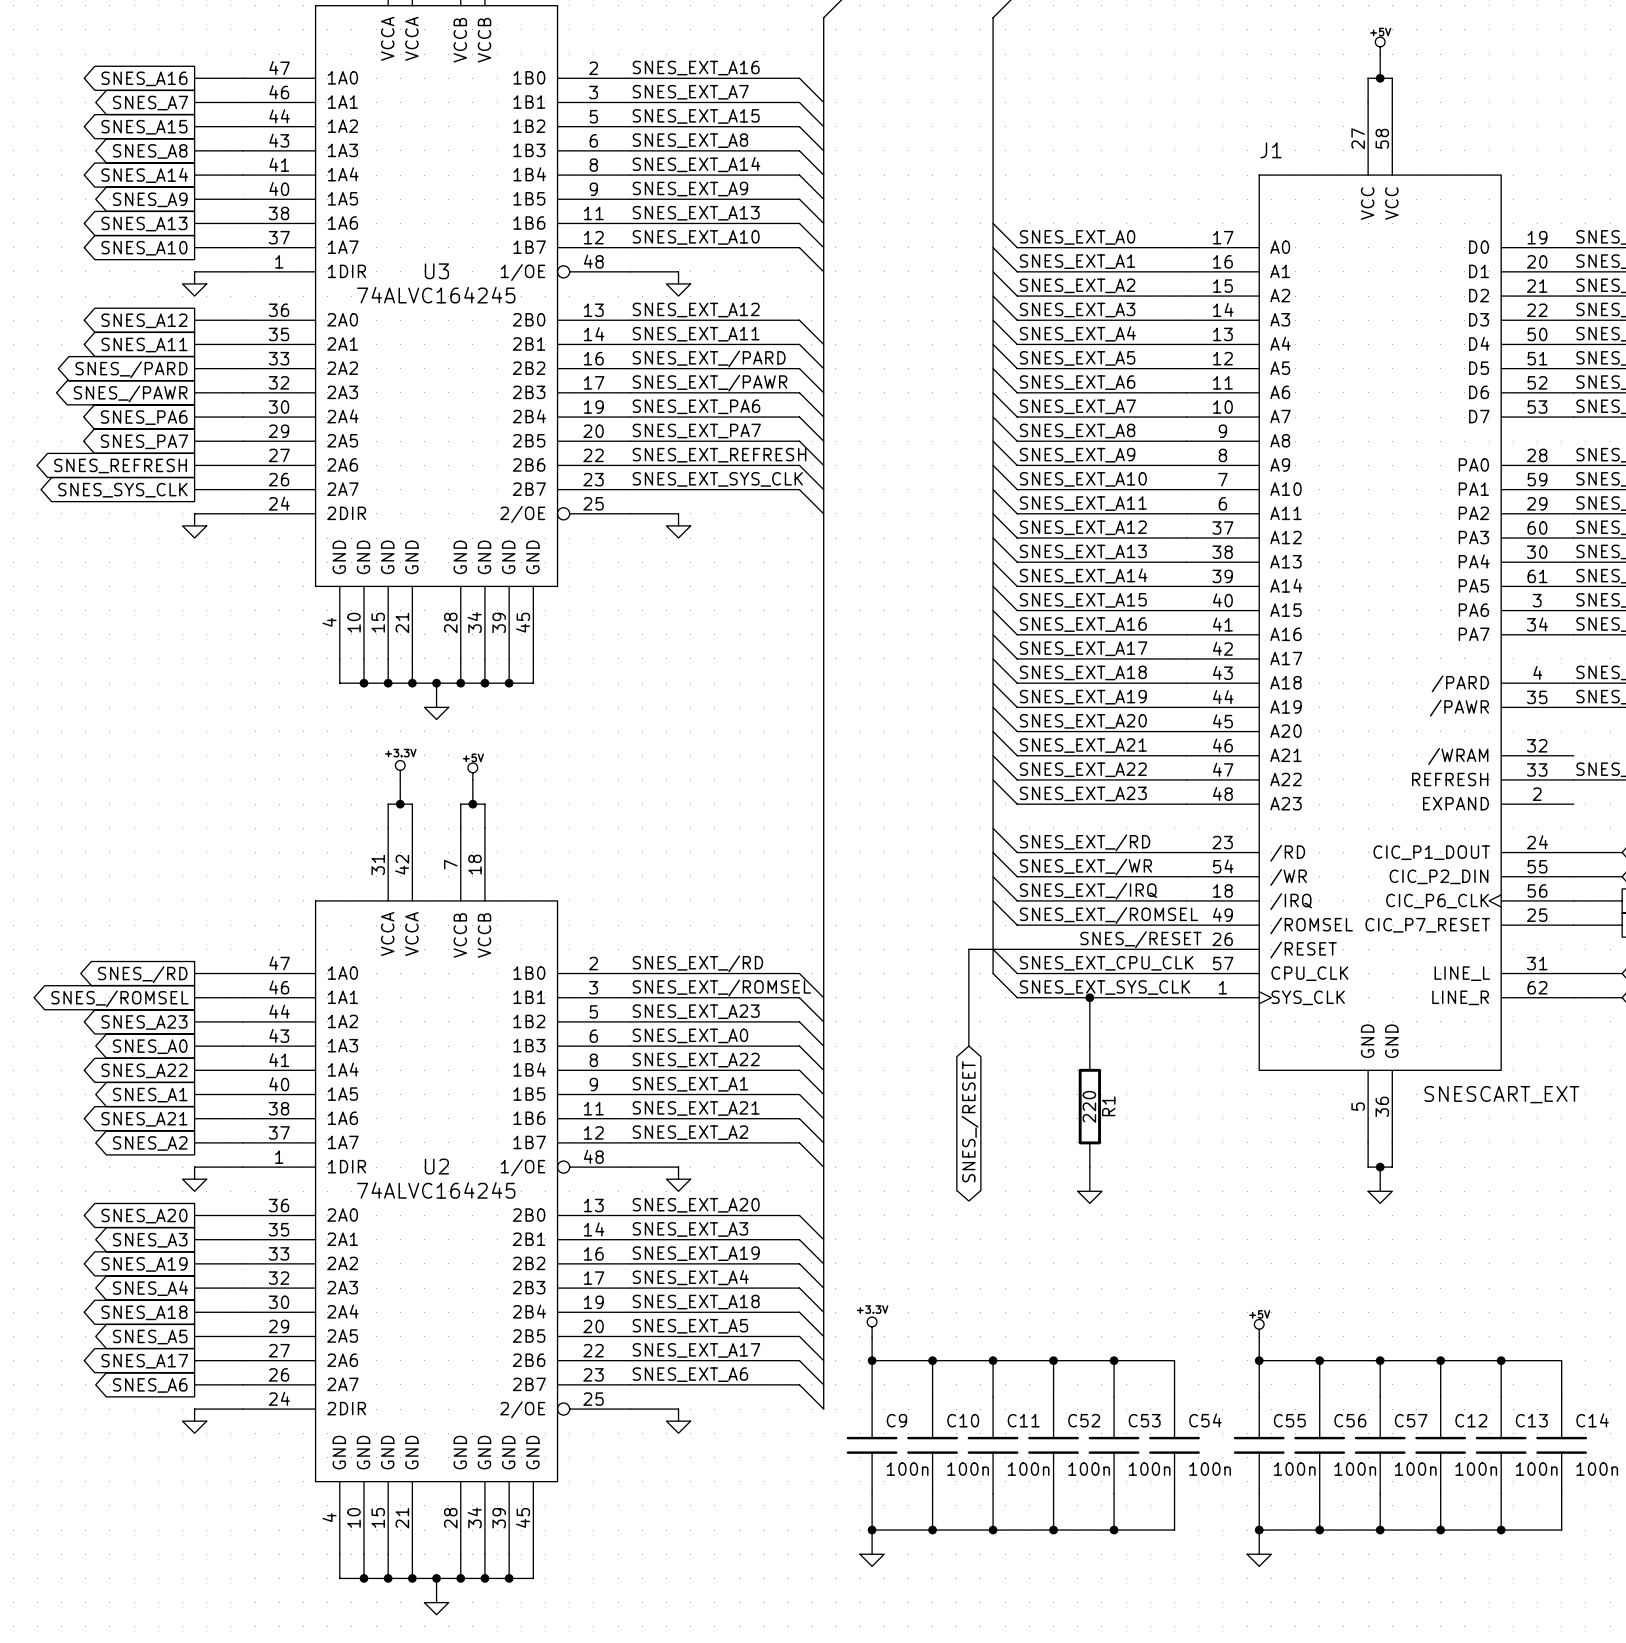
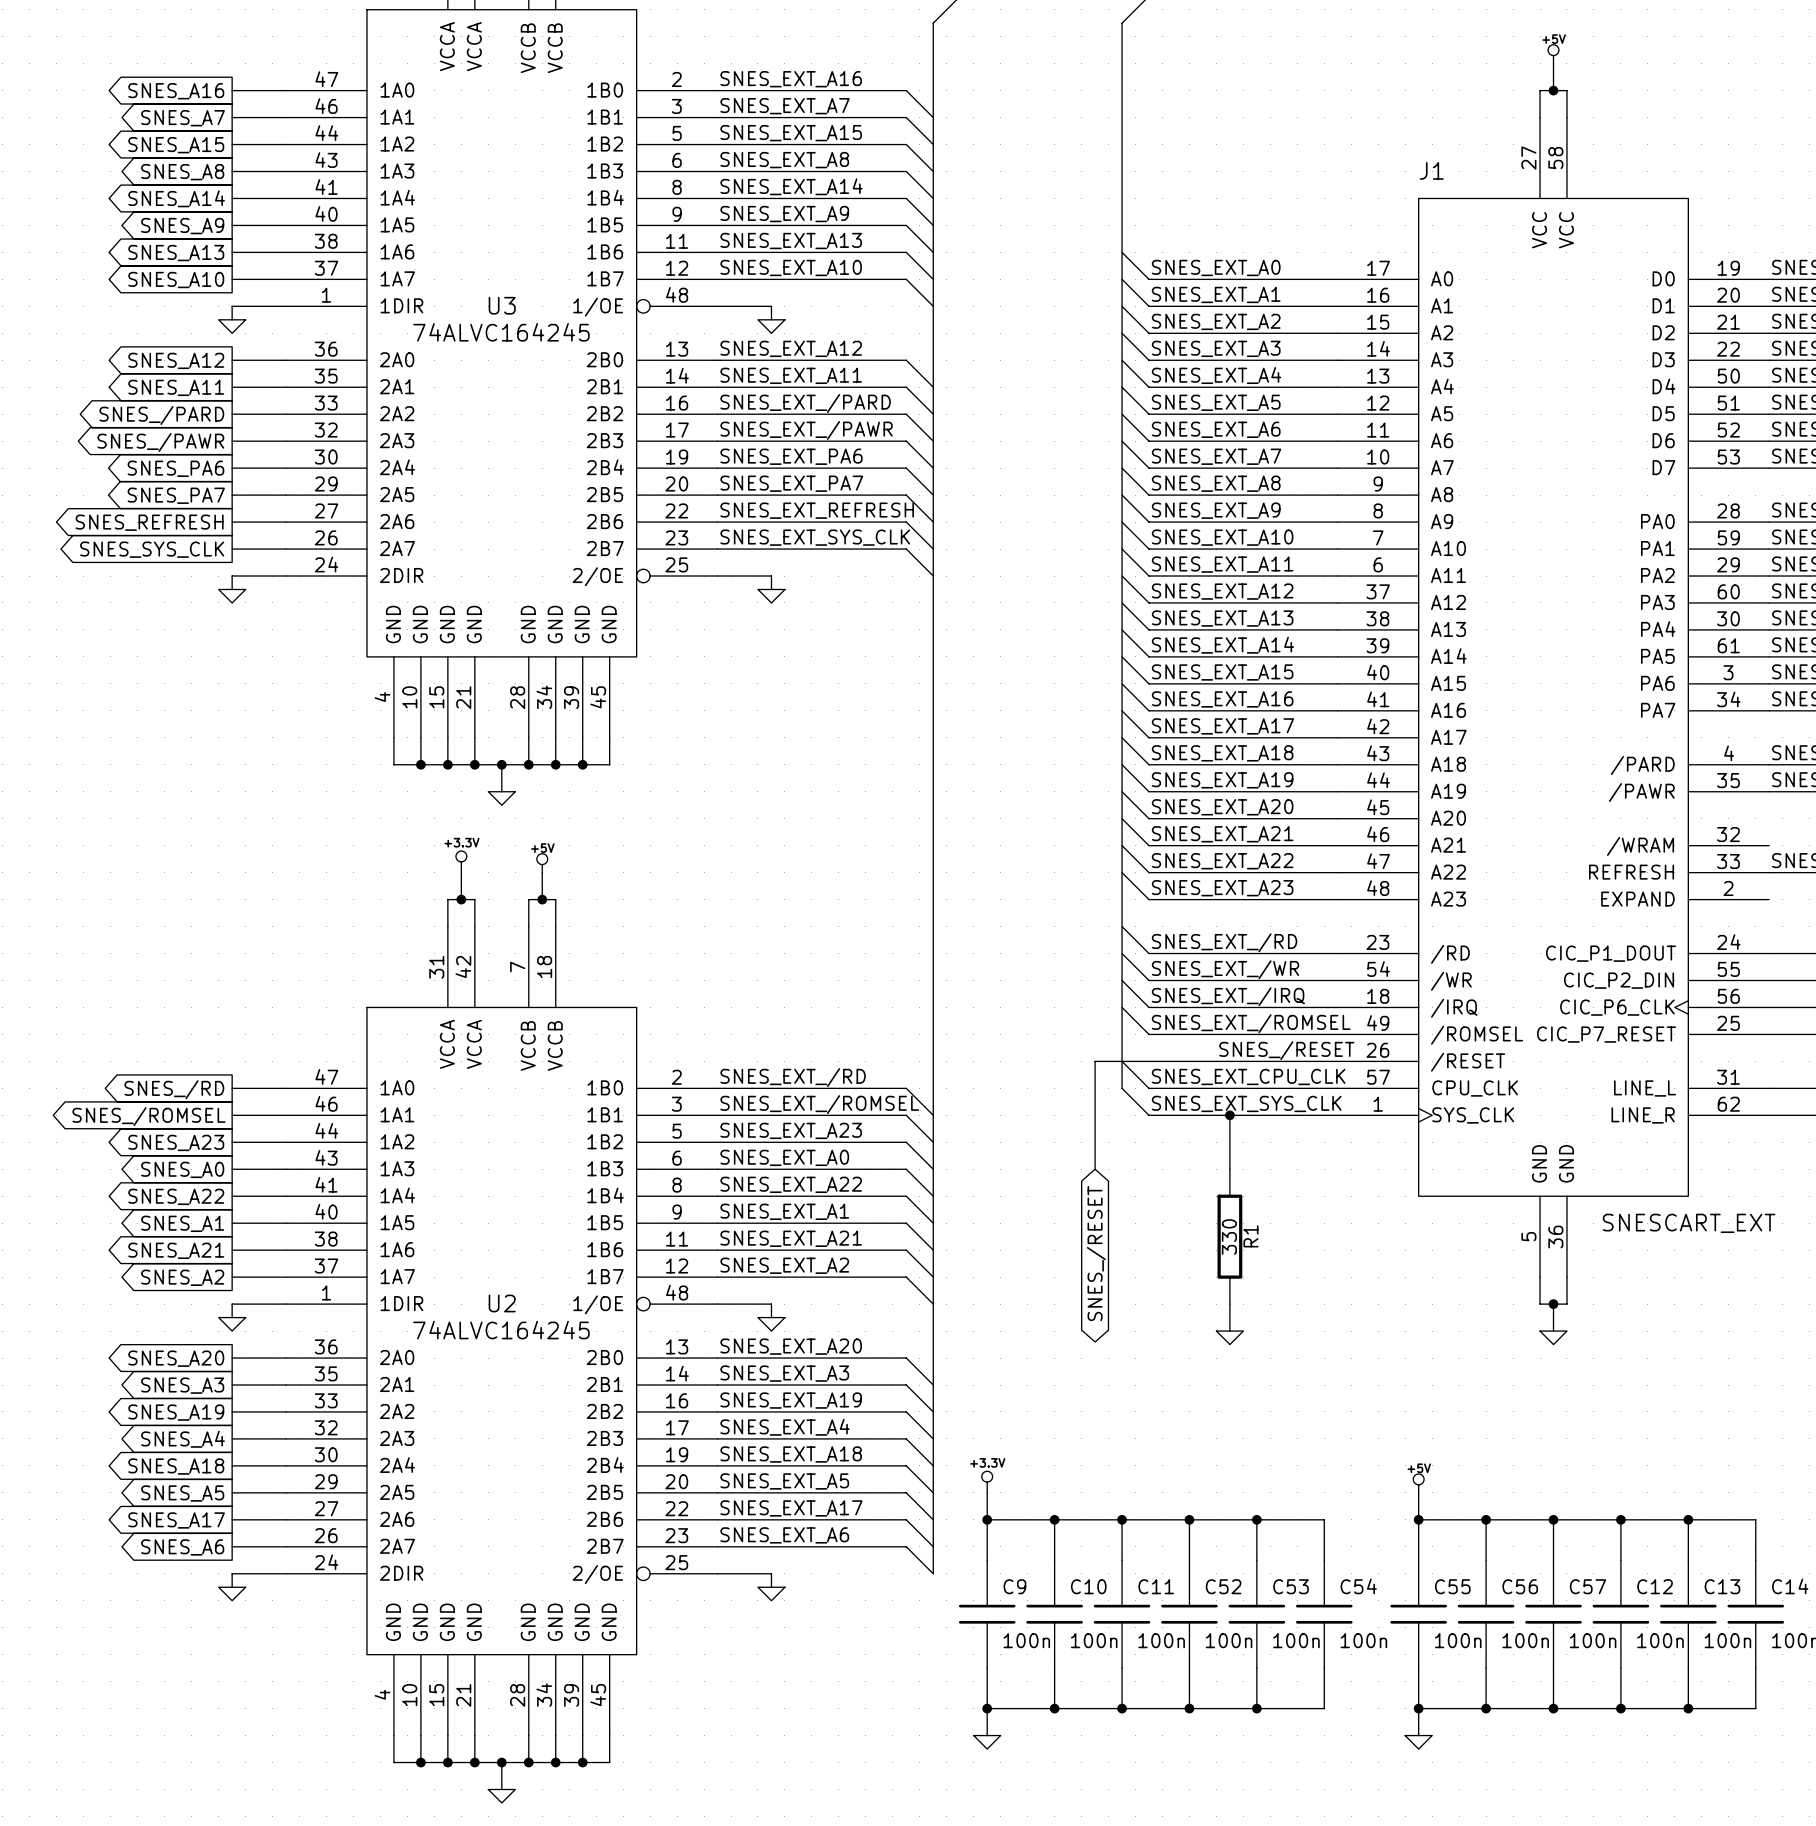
R1 value: 220 (1089, 1106) -> 330 (1229, 1237)

